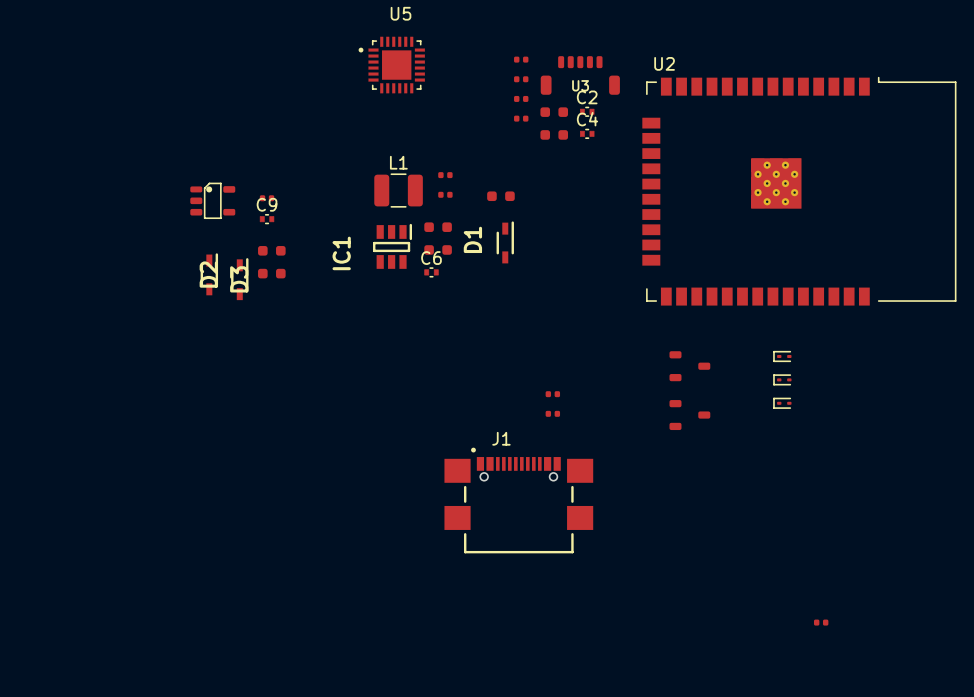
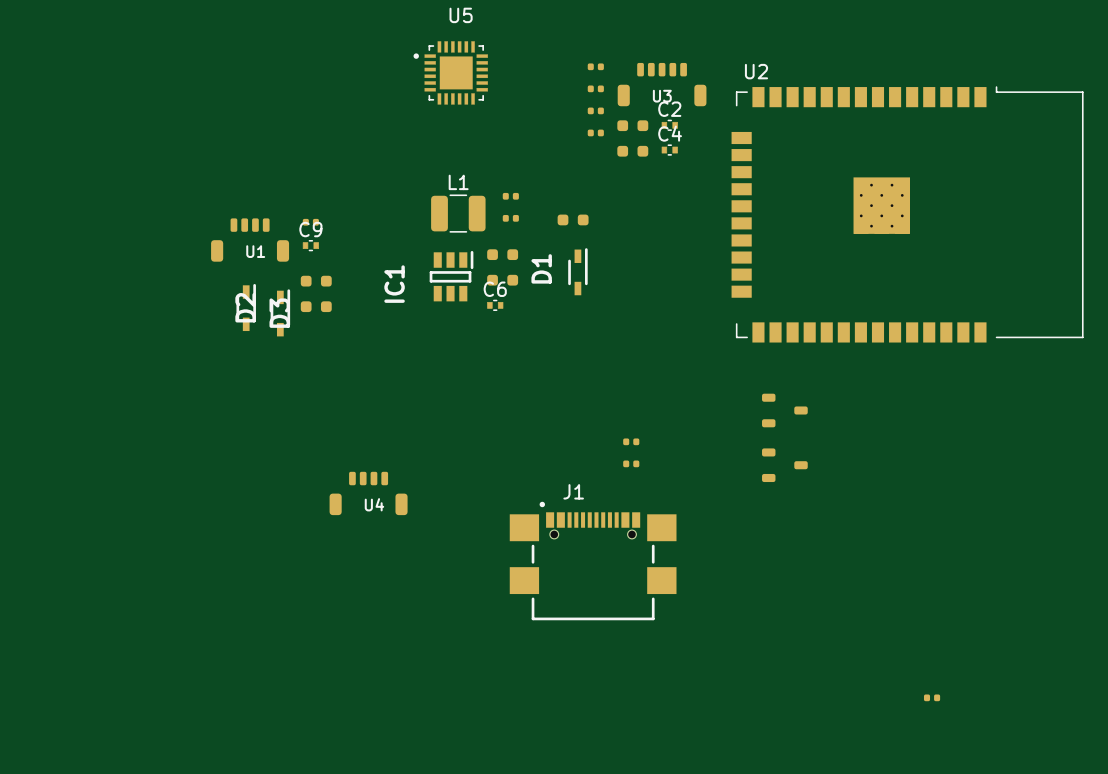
part: (212, 200) -> none
U1: none -> (250, 240)
part: (782, 356) -> none
part: (782, 379) -> none
part: (782, 403) -> none
U4: none -> (368, 493)

